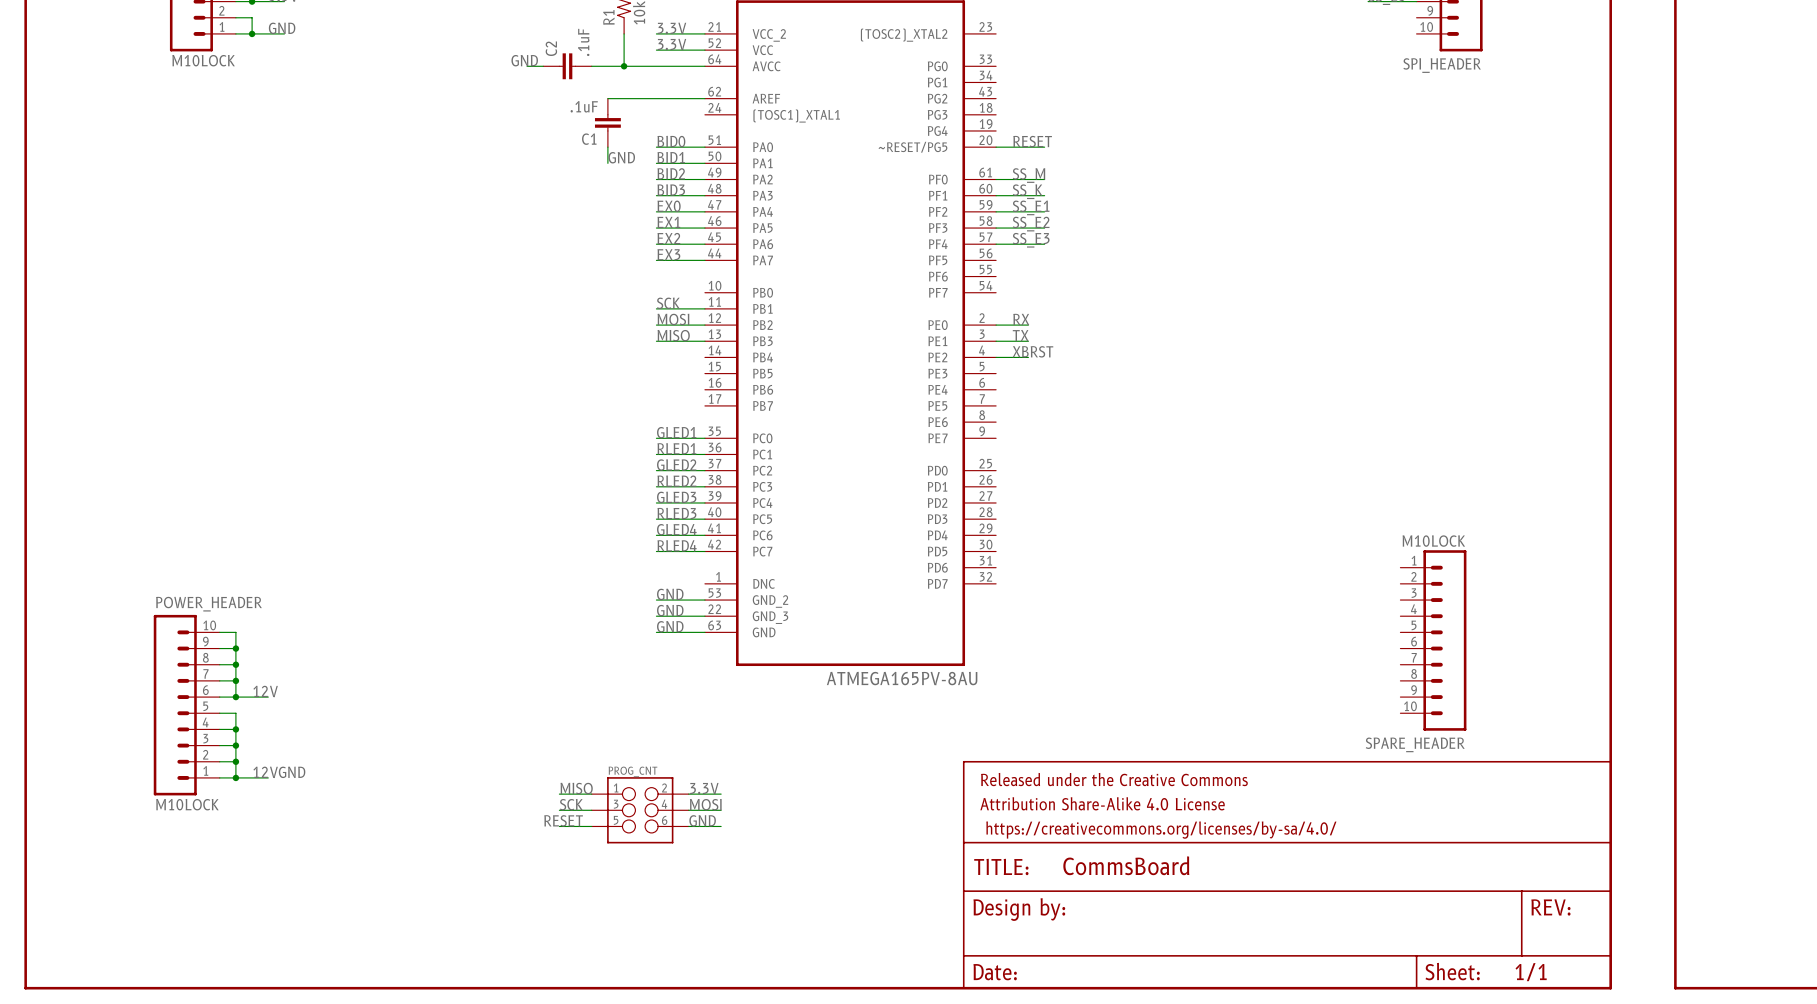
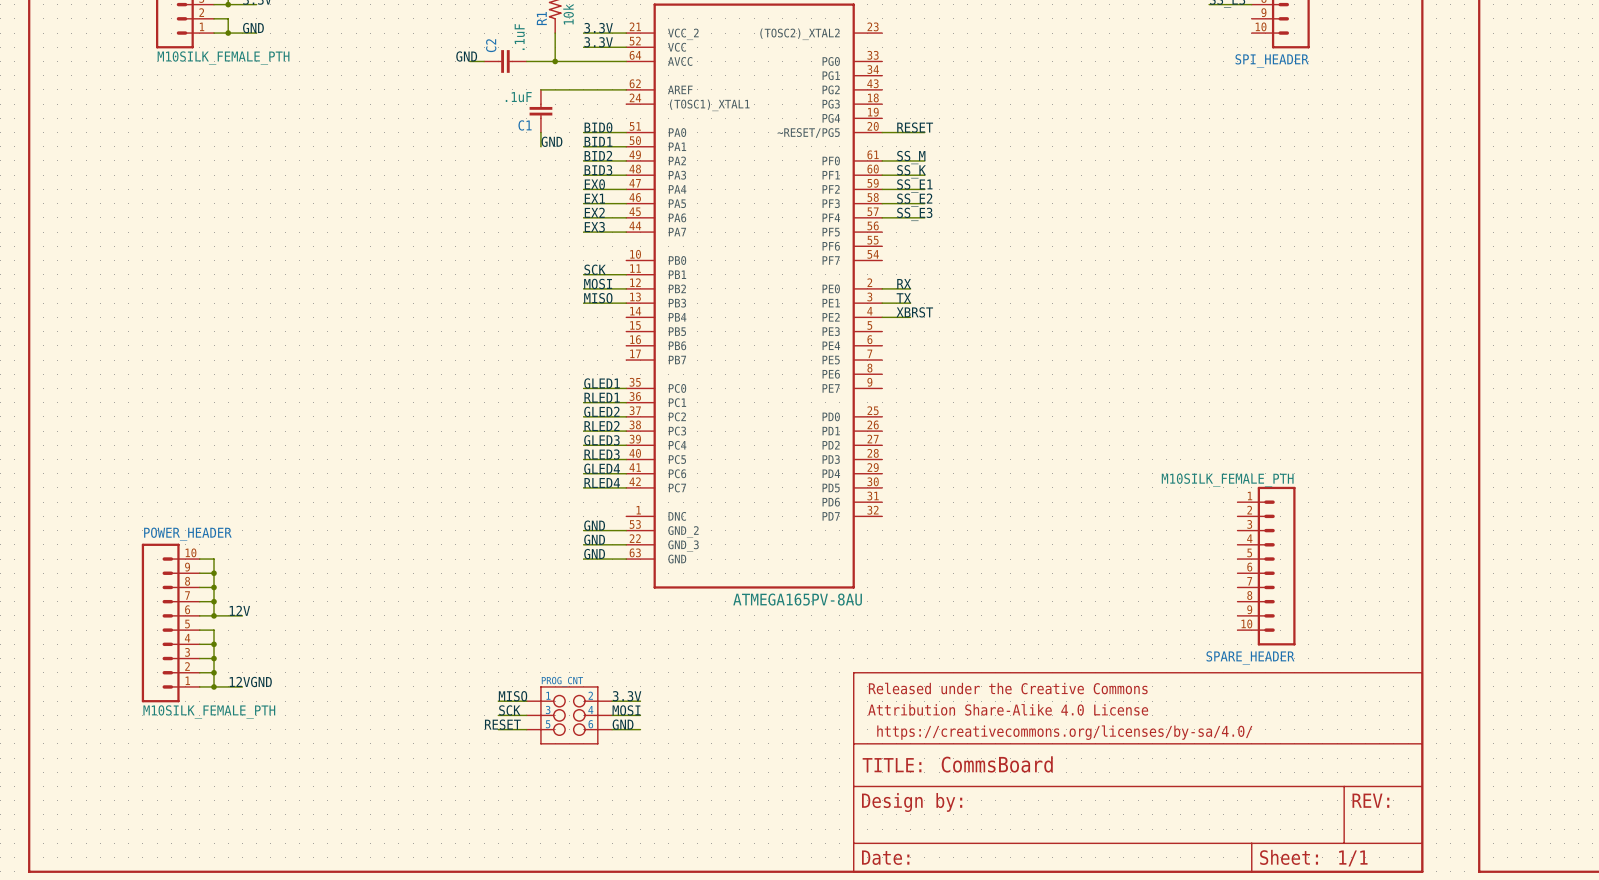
part value: M10LOCK (203, 60) -> M10SILK_FEMALE_PTH (223, 58)
SPARE_HEADER value: M10LOCK (1433, 541) -> M10SILK_FEMALE_PTH (1227, 480)
POWER_HEADER value: M10LOCK (187, 804) -> M10SILK_FEMALE_PTH (209, 711)

